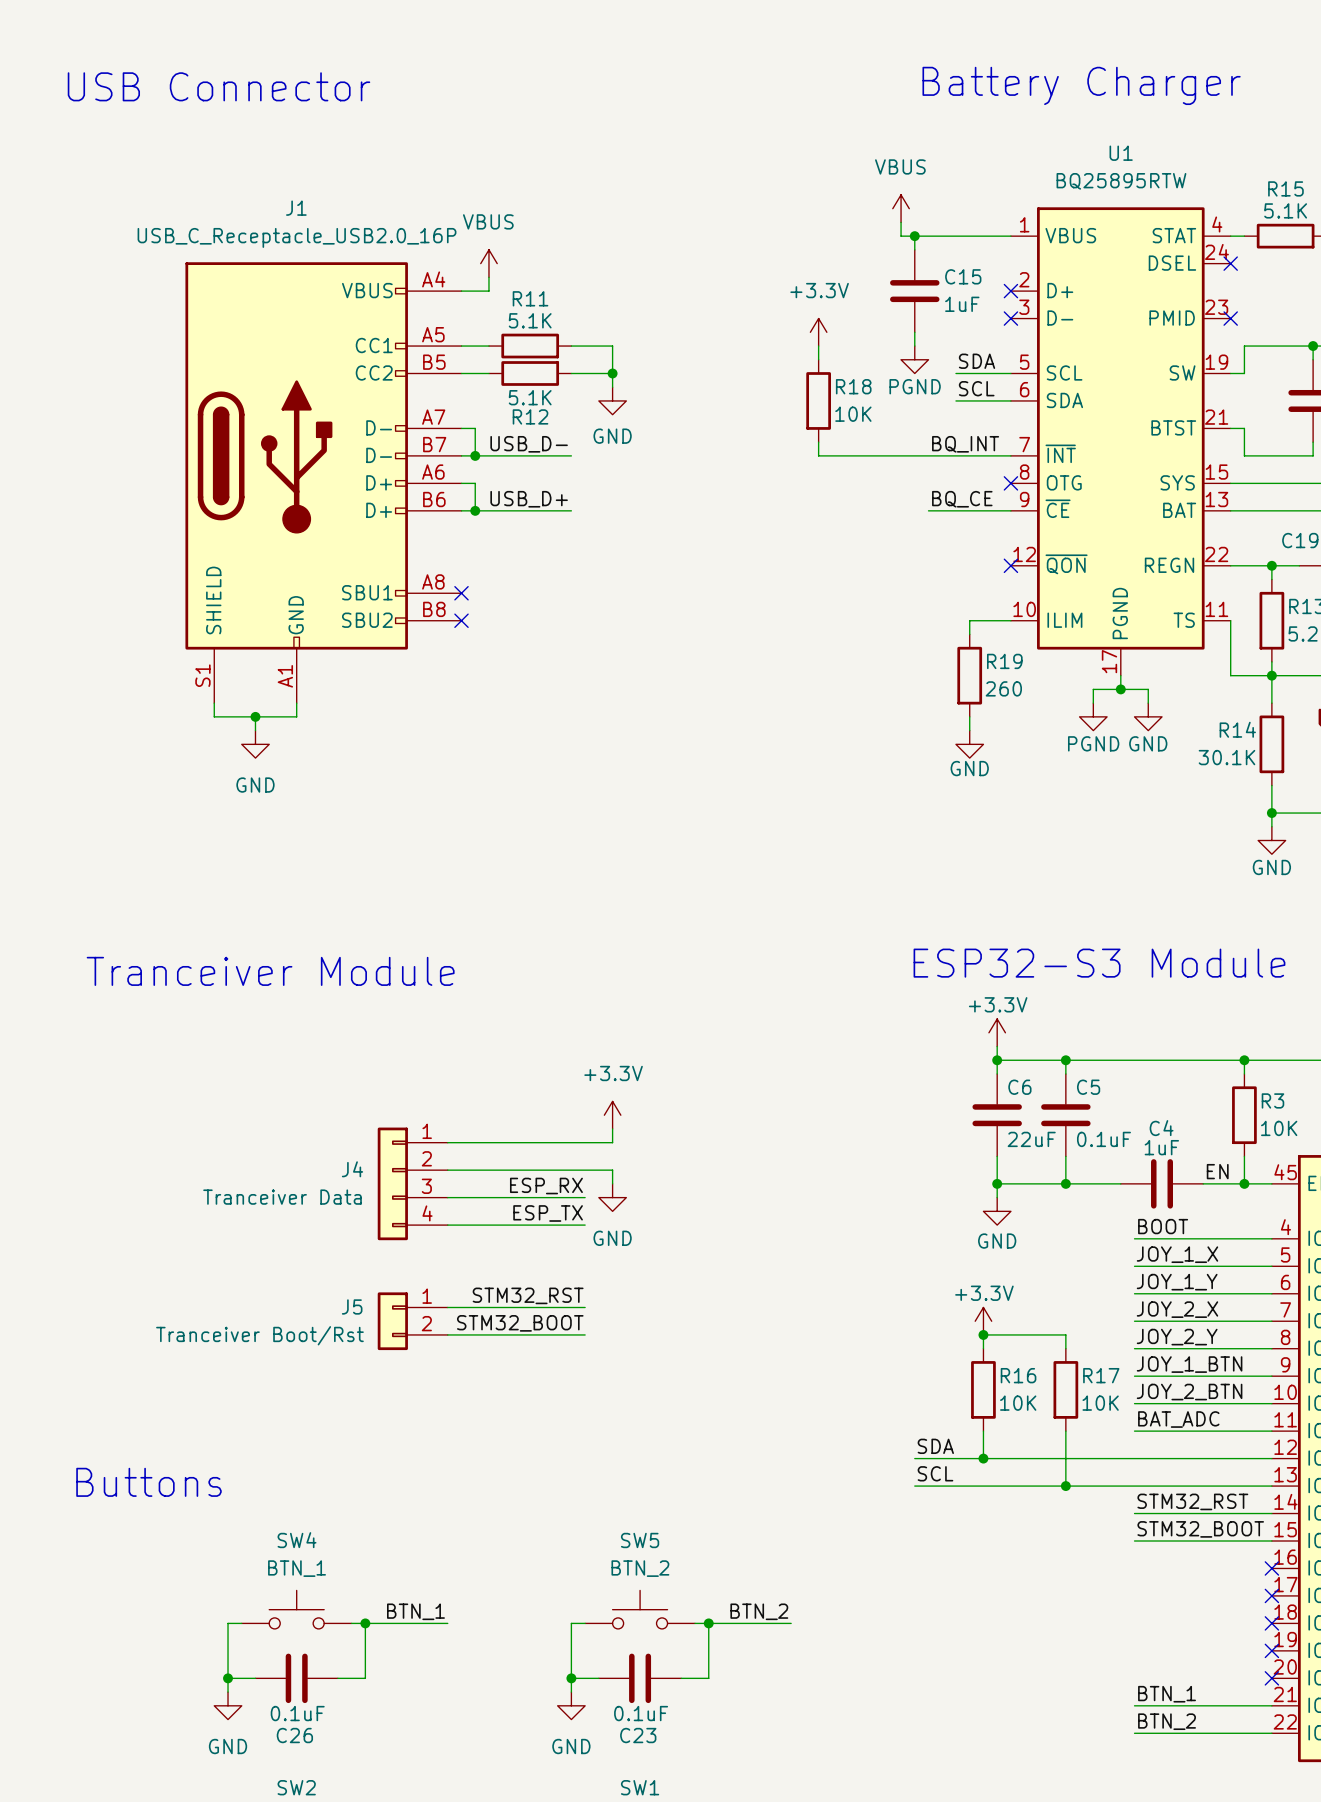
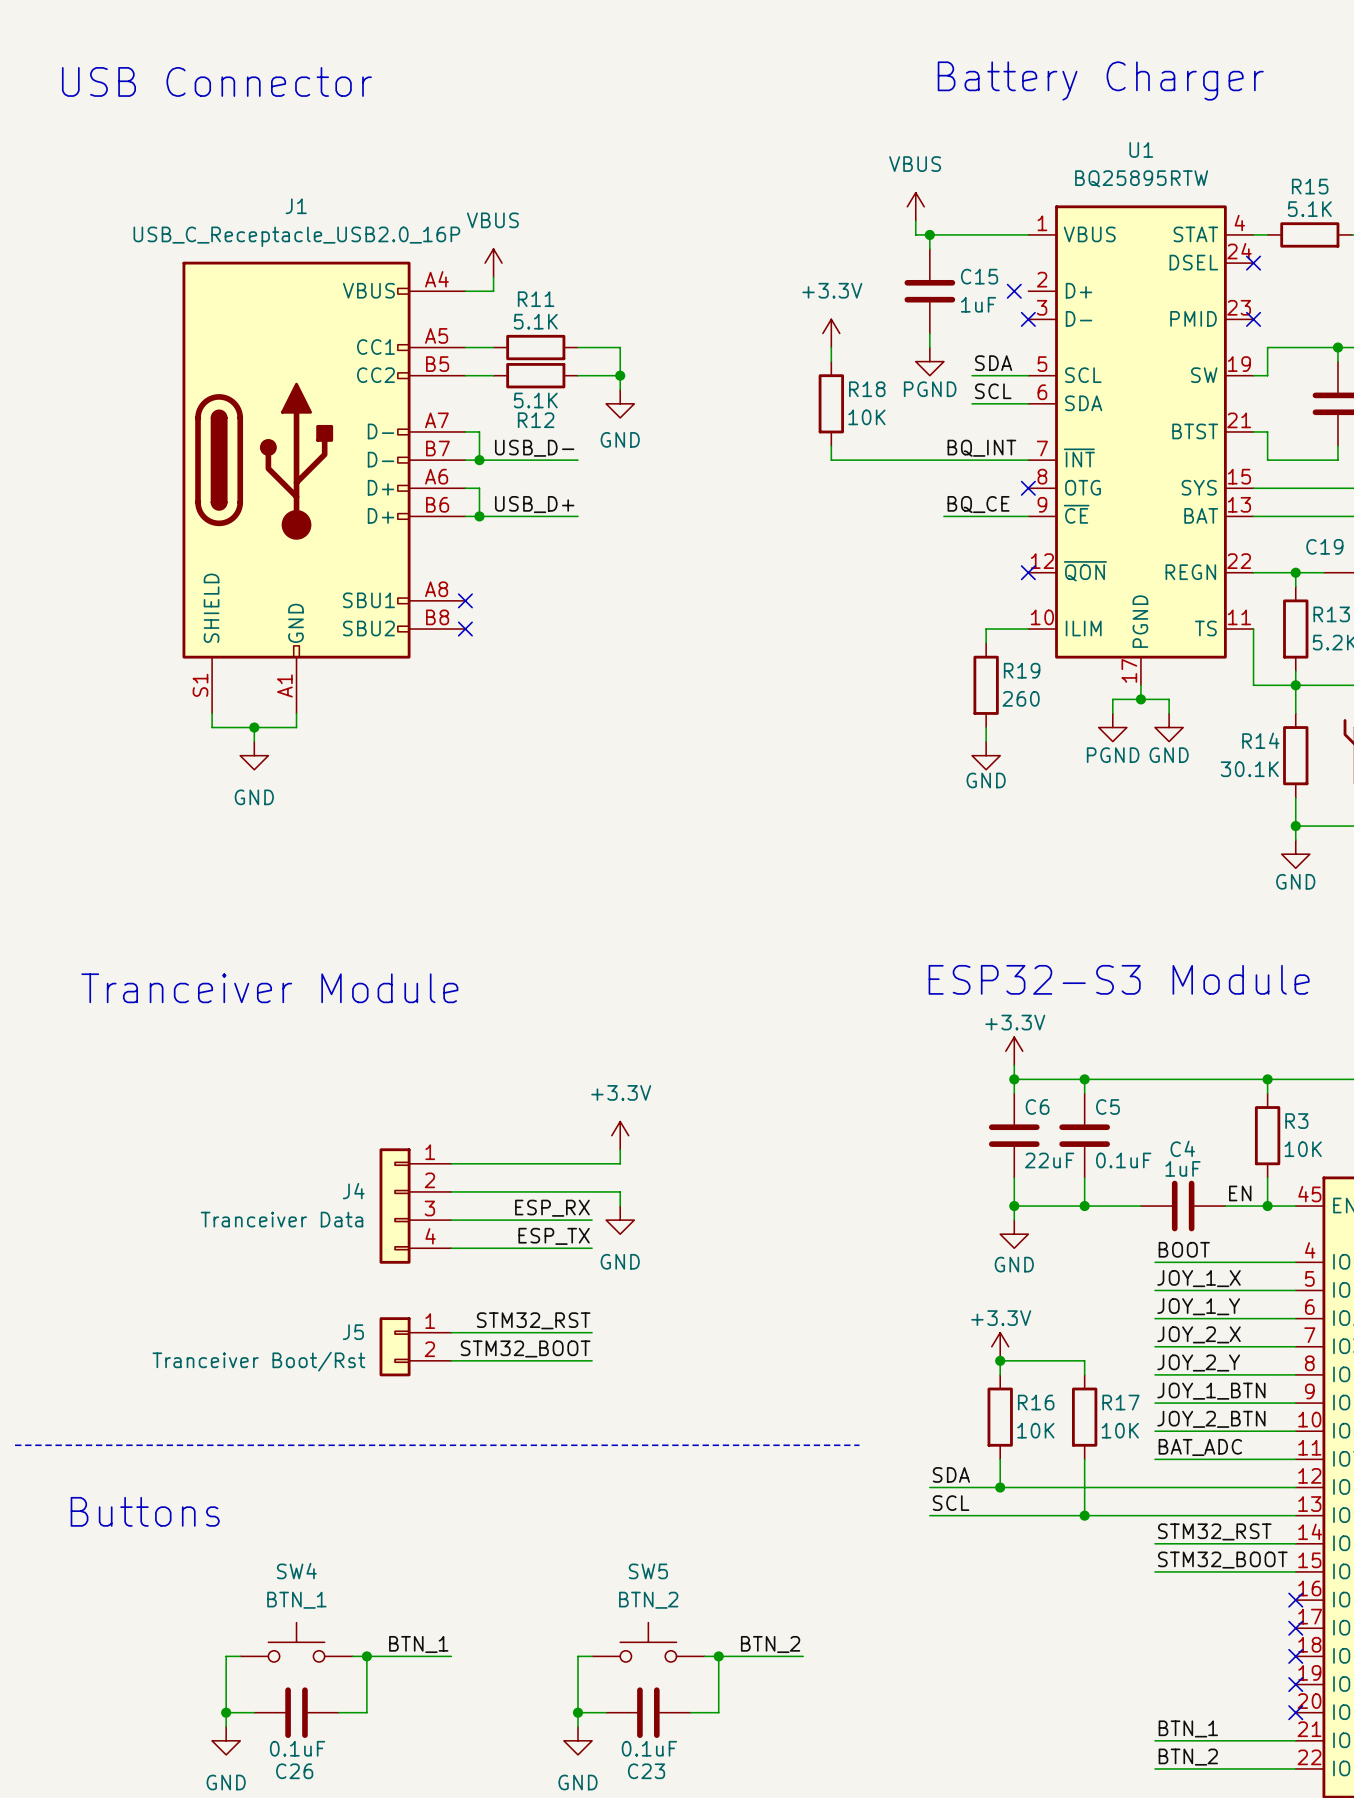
no-connect mark position: (1010, 291) -> (1014, 291)
line: none -> (15, 1445) (859, 1445)

